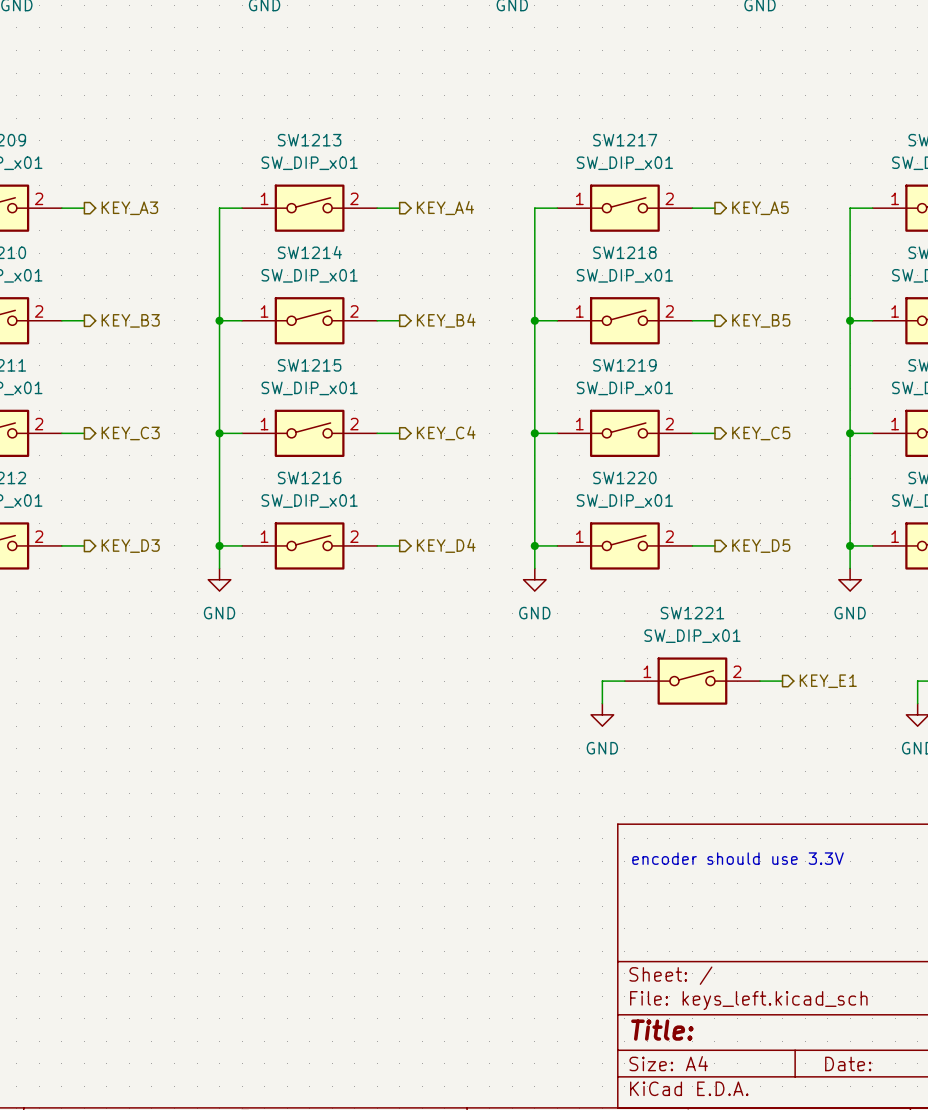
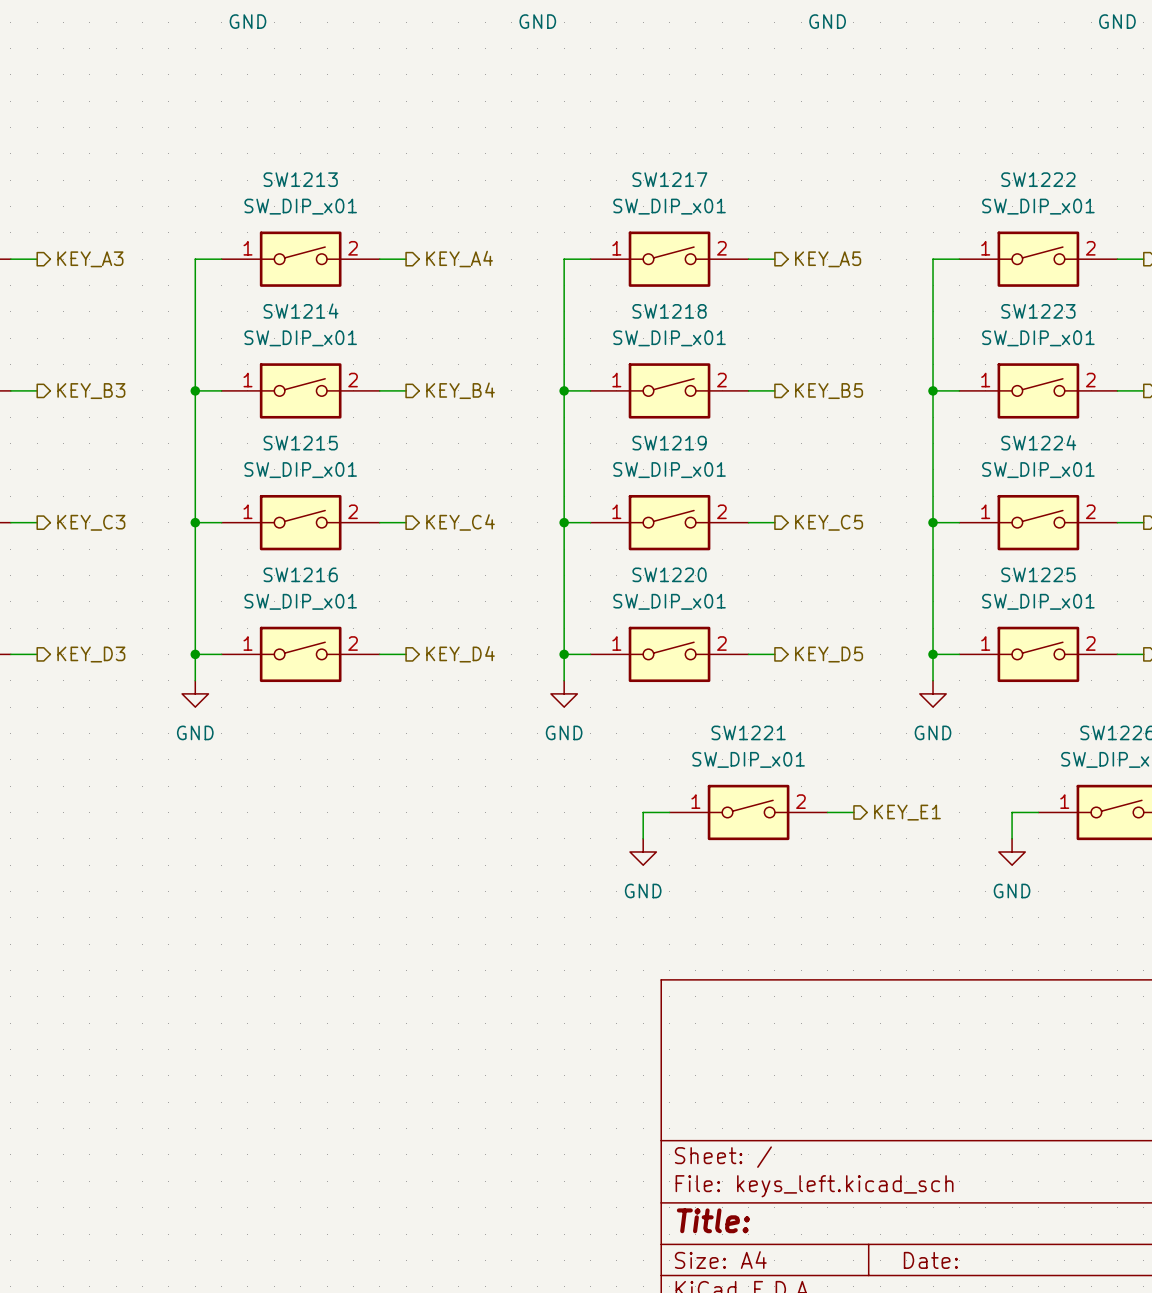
text: encoder should use 3.3V (738, 858) -> none

